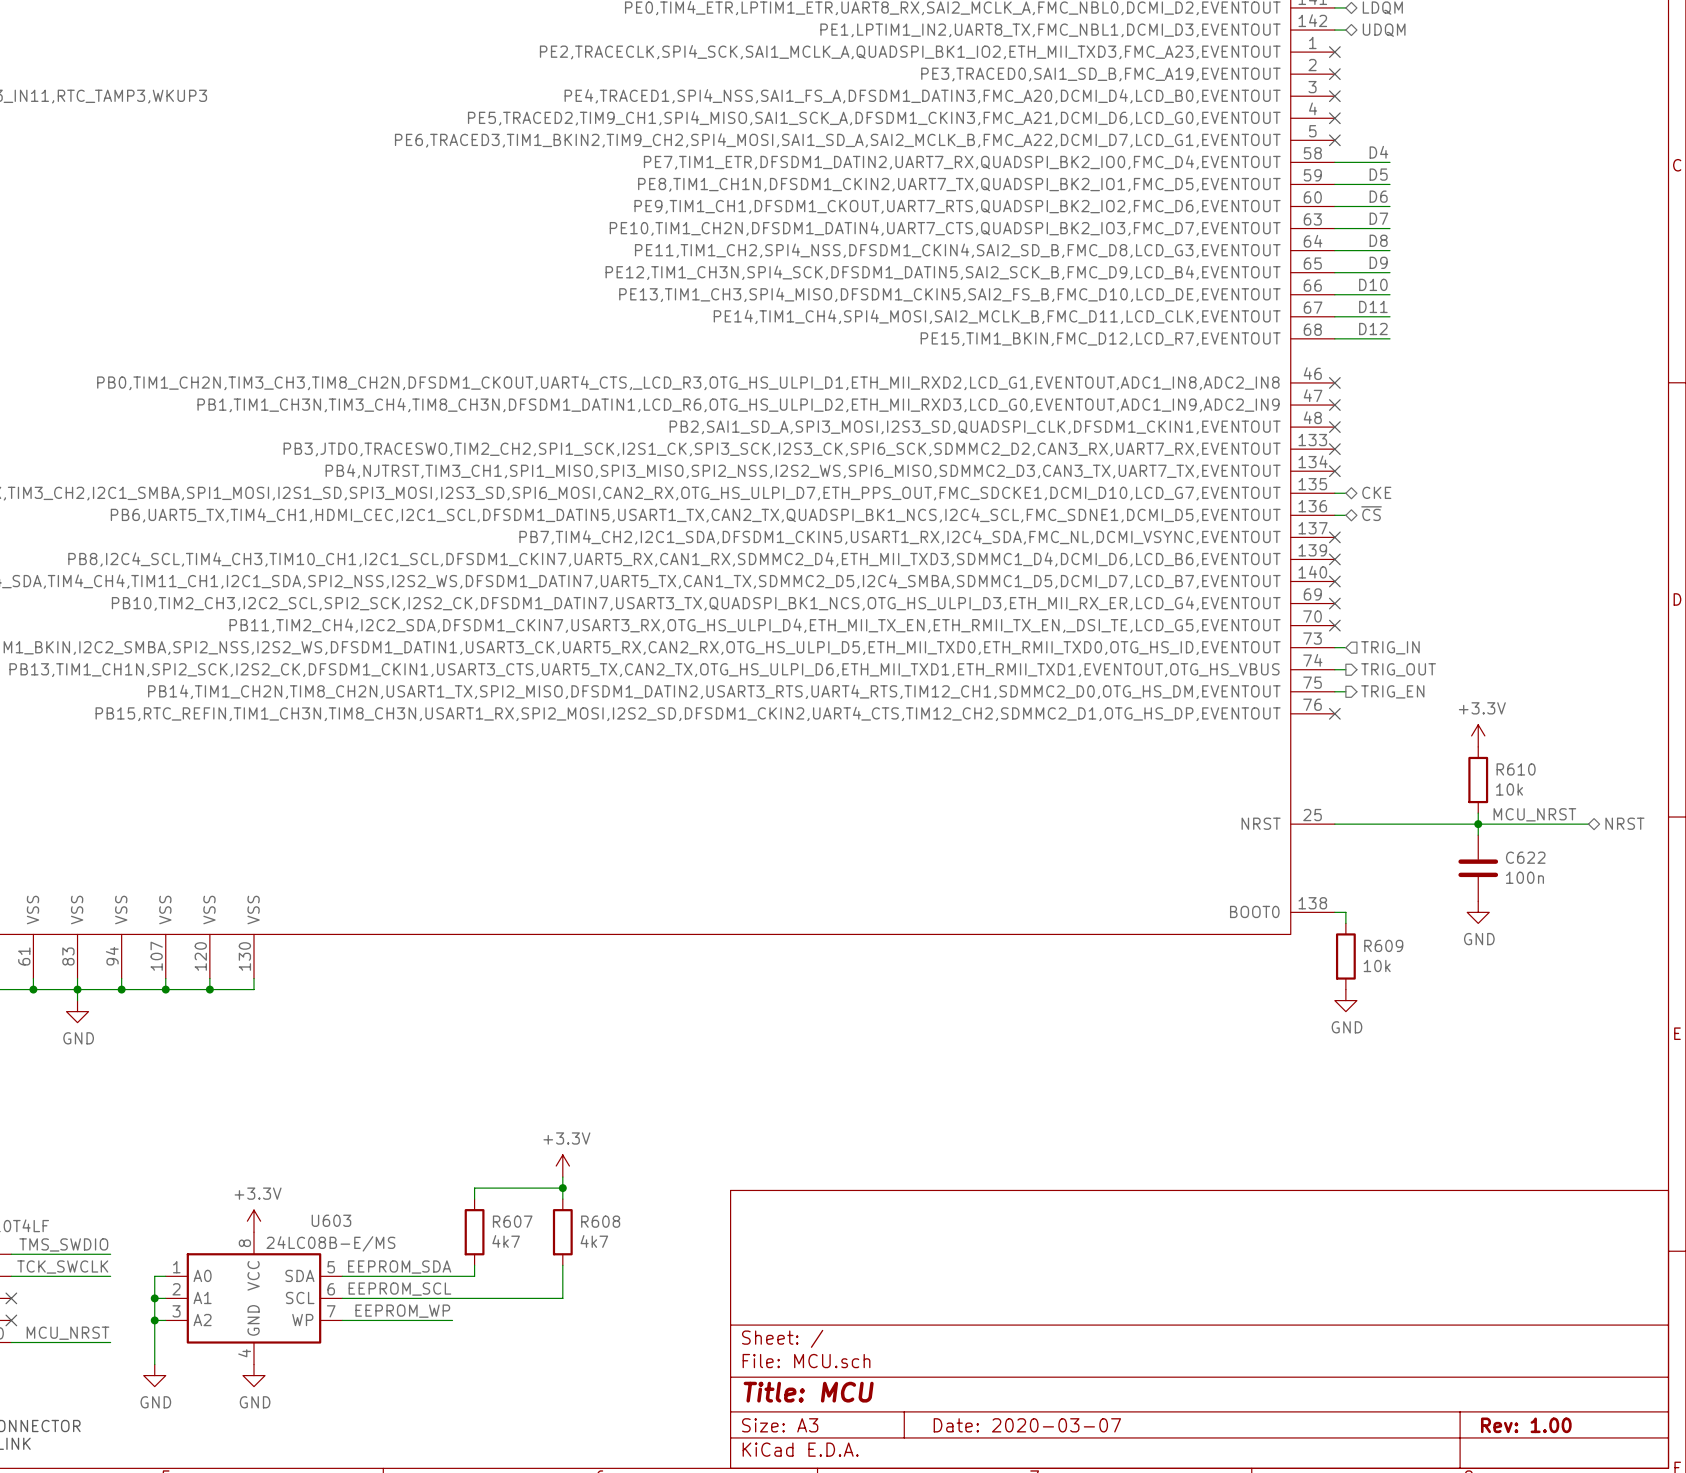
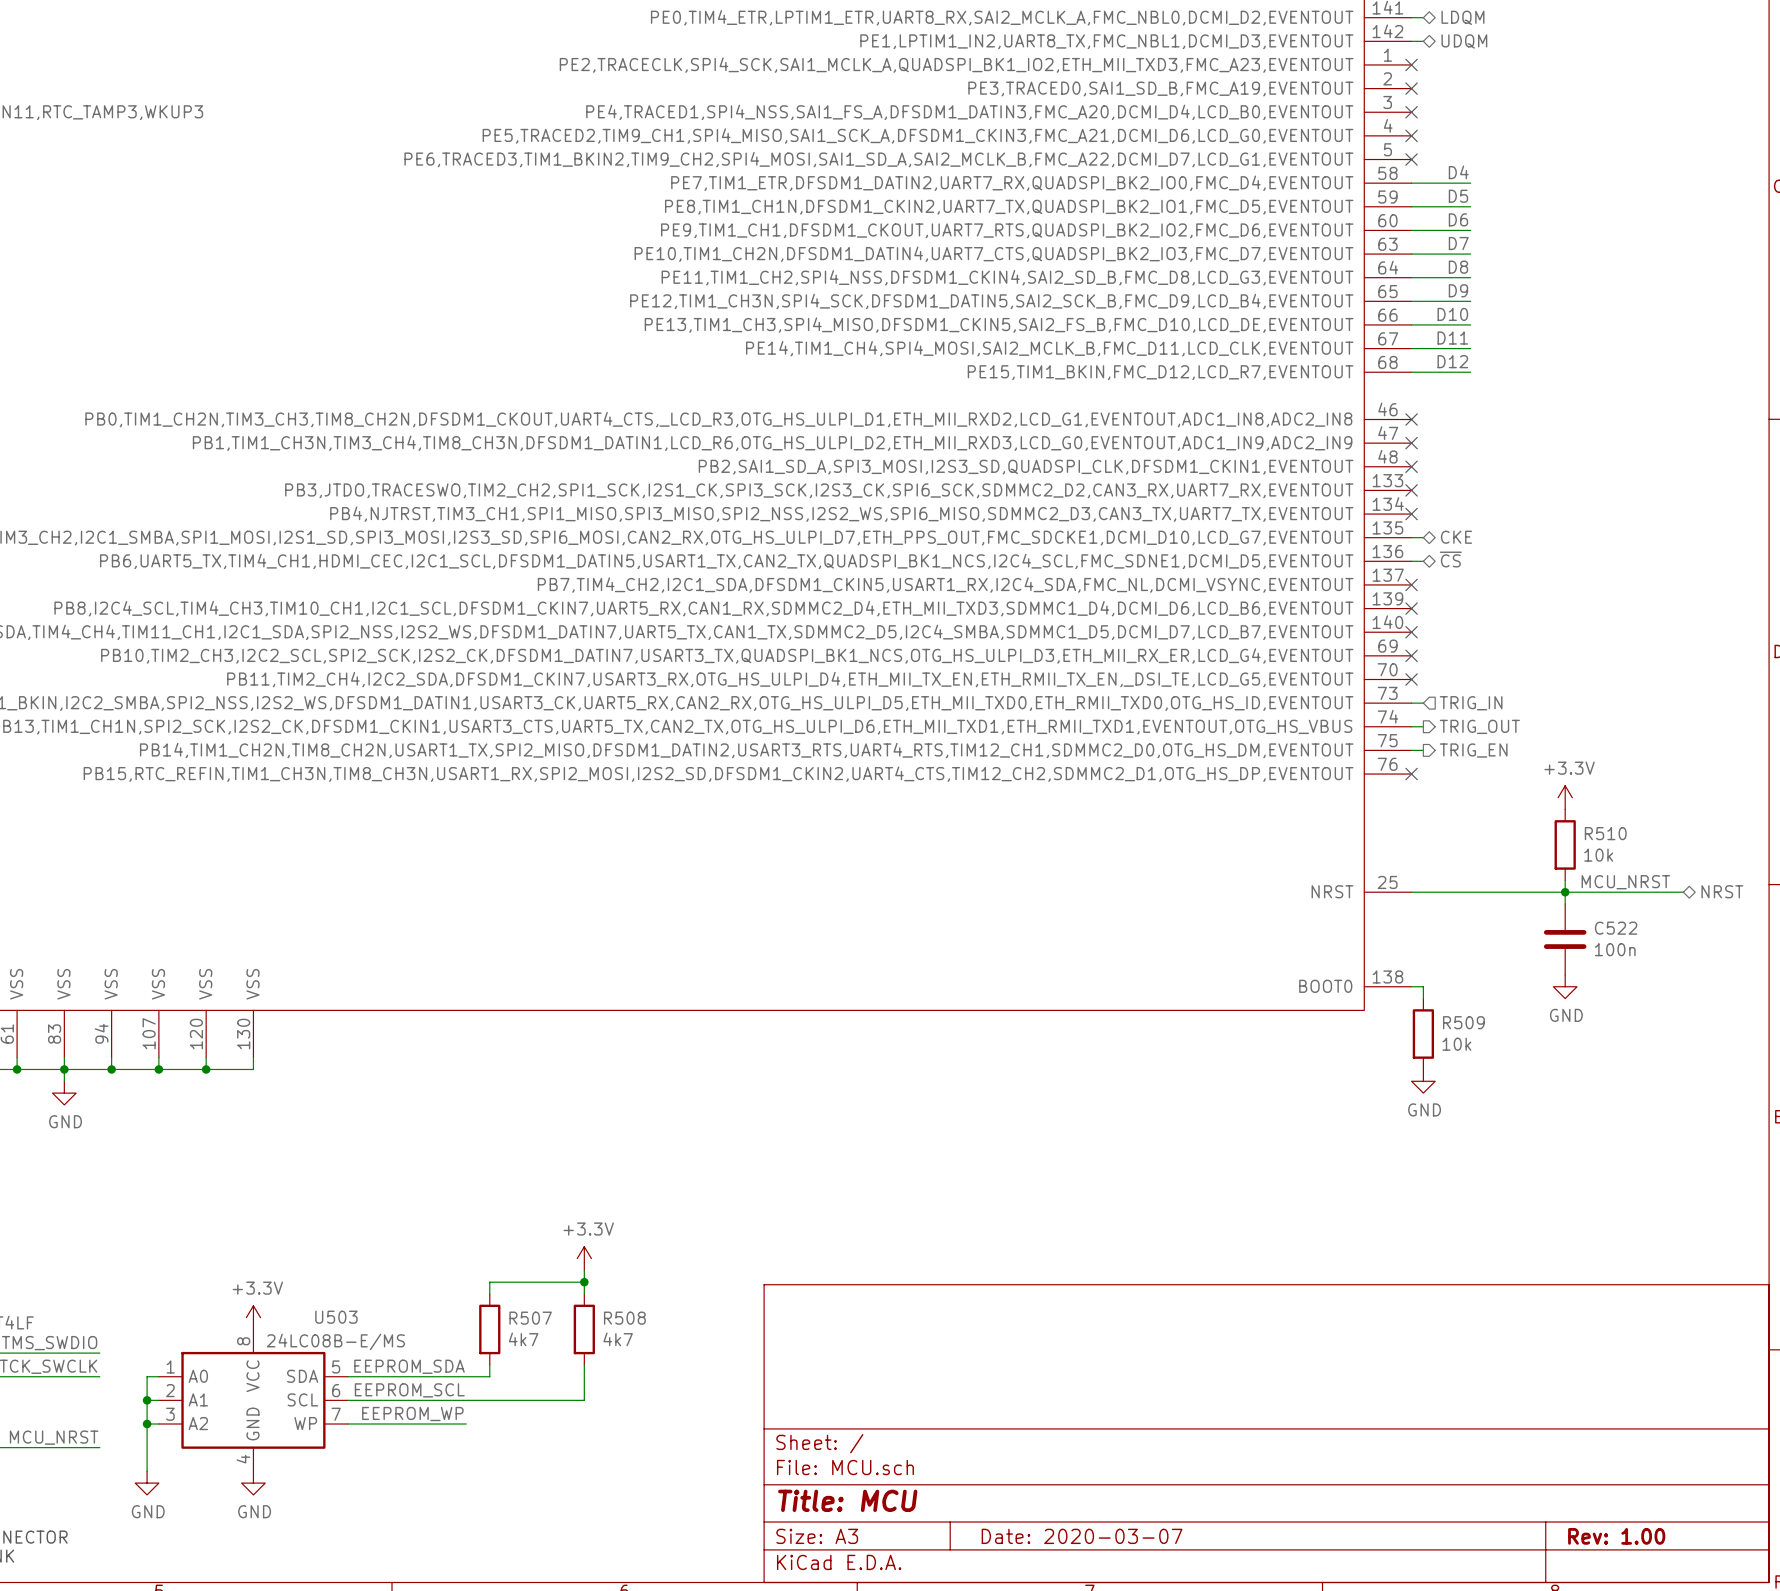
R610 name: R610 (1516, 769) -> R510 (1605, 833)
C622 name: C622 (1525, 857) -> C522 (1616, 928)
R609 name: R609 (1383, 945) -> R509 (1463, 1022)
U603 name: U603 (331, 1220) -> U503 (336, 1317)
R607 name: R607 (512, 1221) -> R507 (530, 1318)
R608 name: R608 (600, 1221) -> R508 (624, 1318)

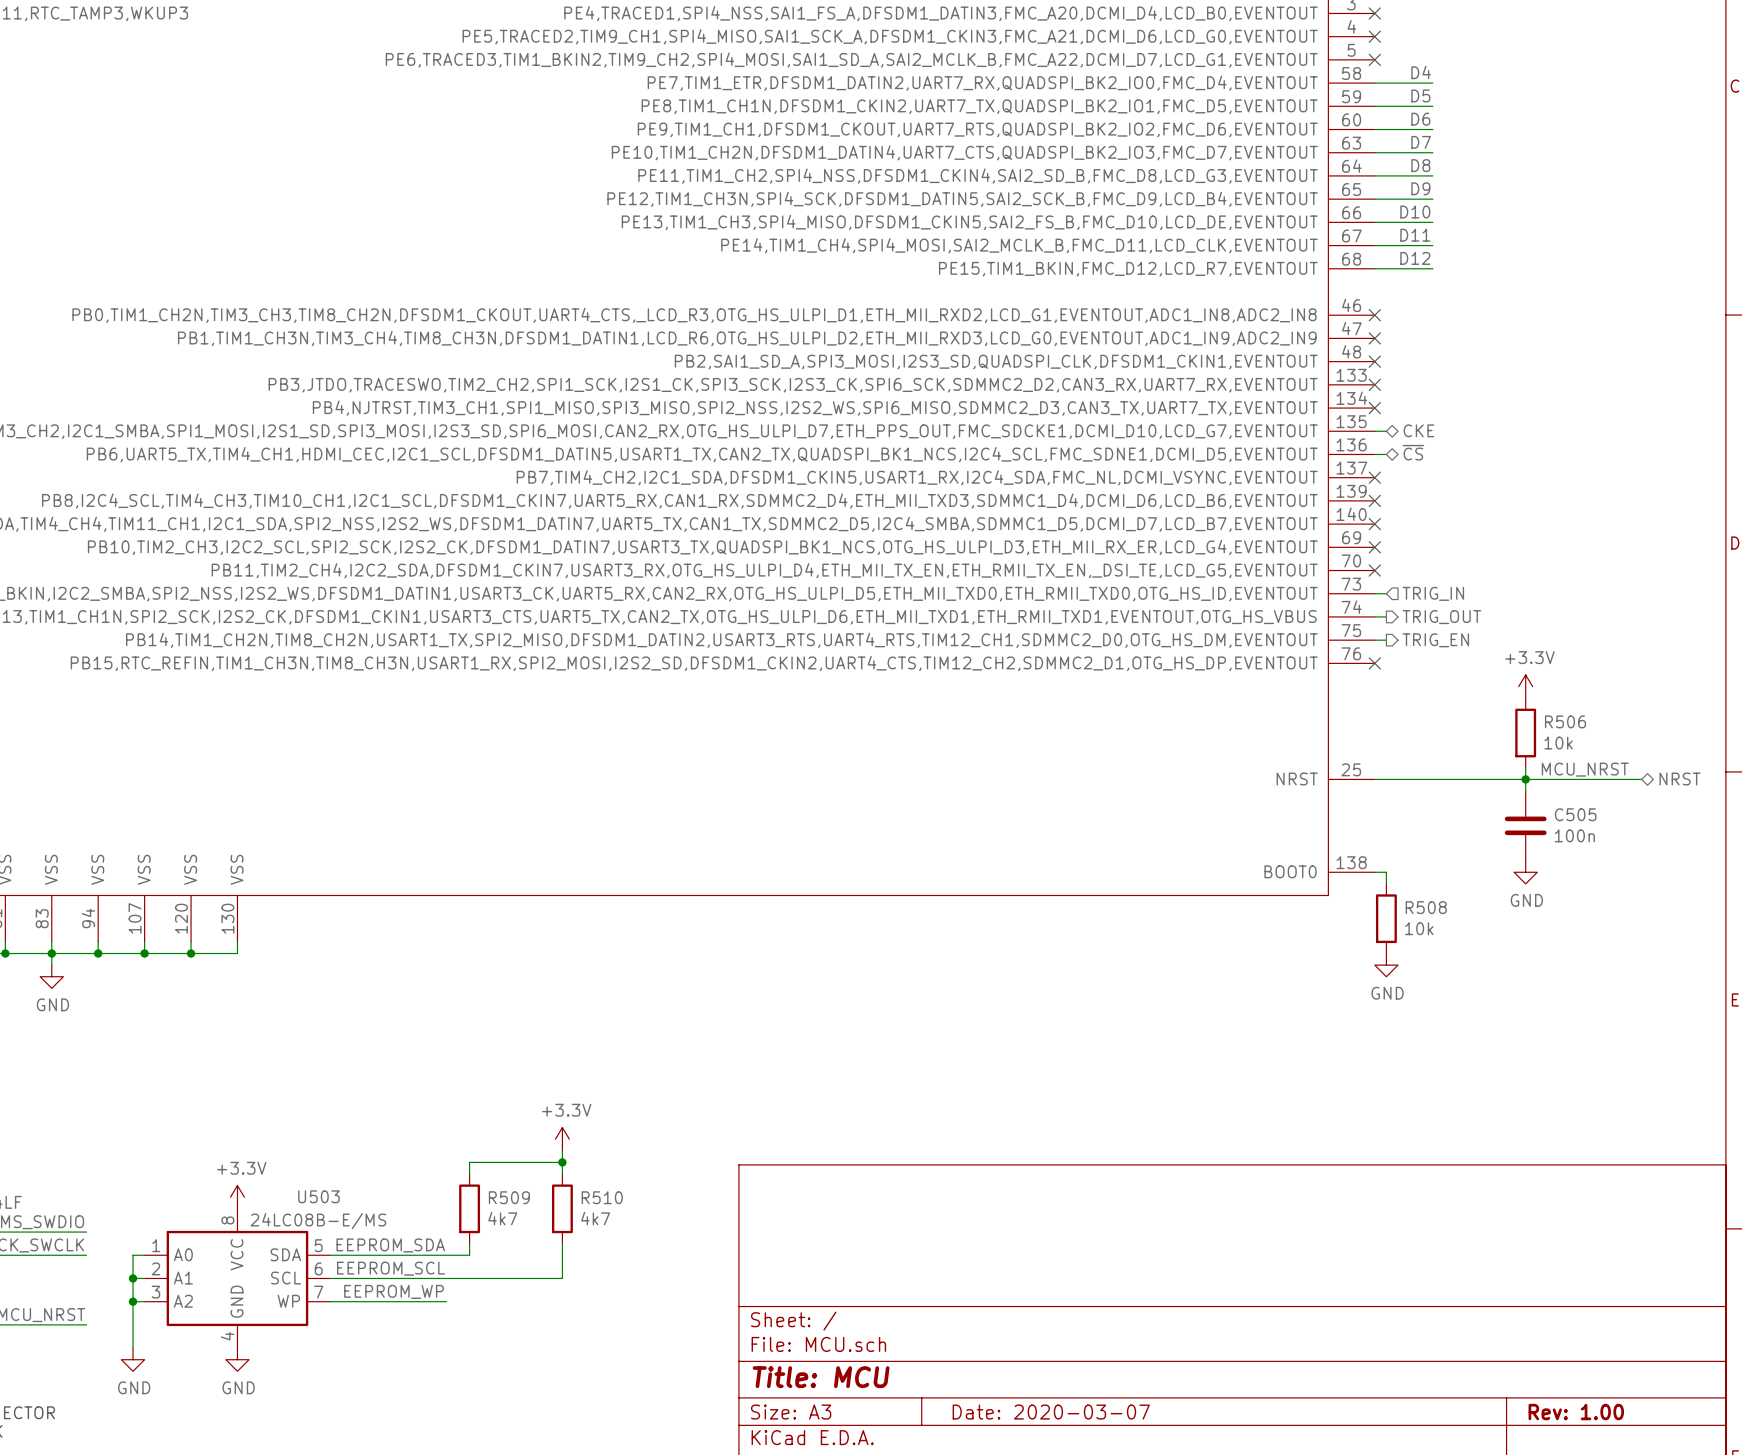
R510 name: R510 (1605, 833) -> R506 (1565, 721)
C522 name: C522 (1616, 928) -> C505 (1575, 814)
R509 name: R509 (1463, 1022) -> R508 (1426, 907)
R507 name: R507 (530, 1318) -> R509 (509, 1197)
R508 name: R508 (624, 1318) -> R510 (602, 1197)

